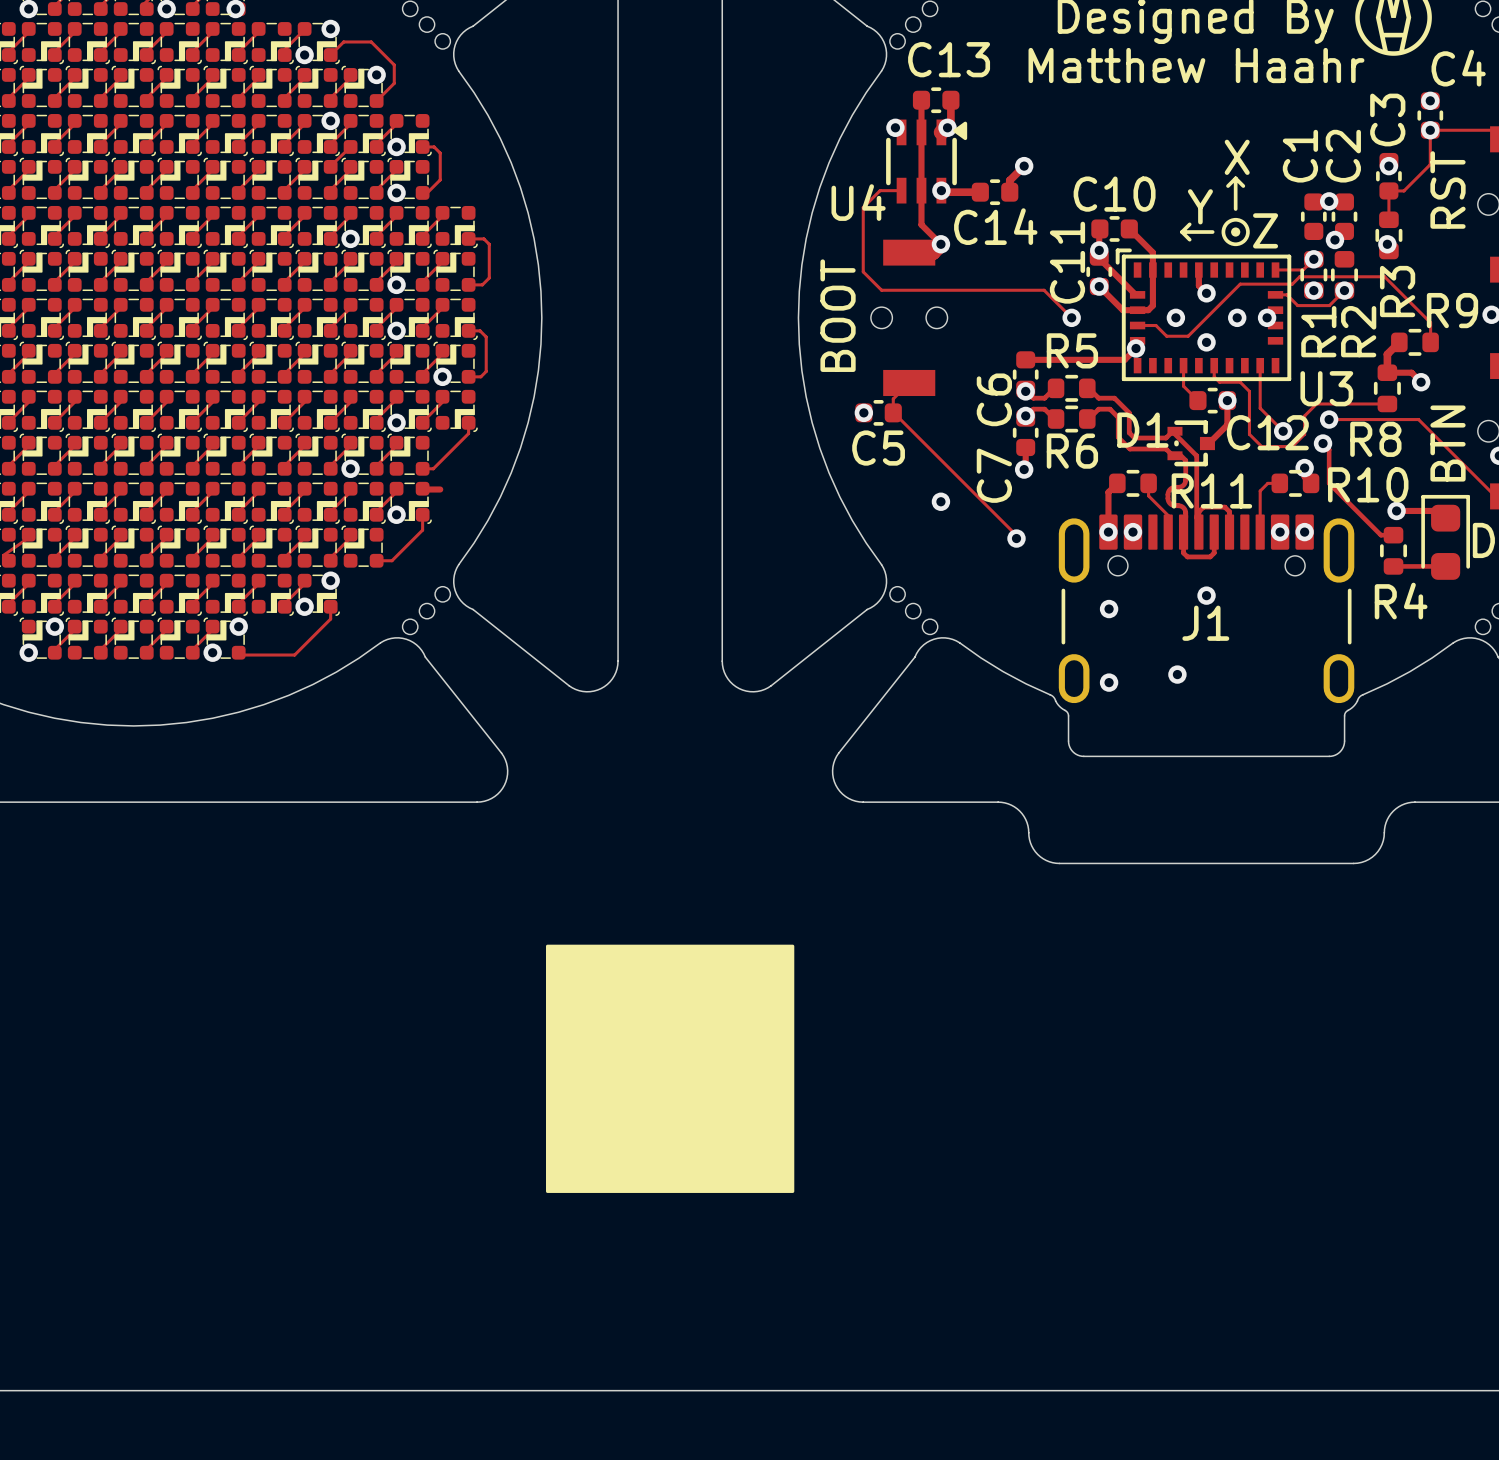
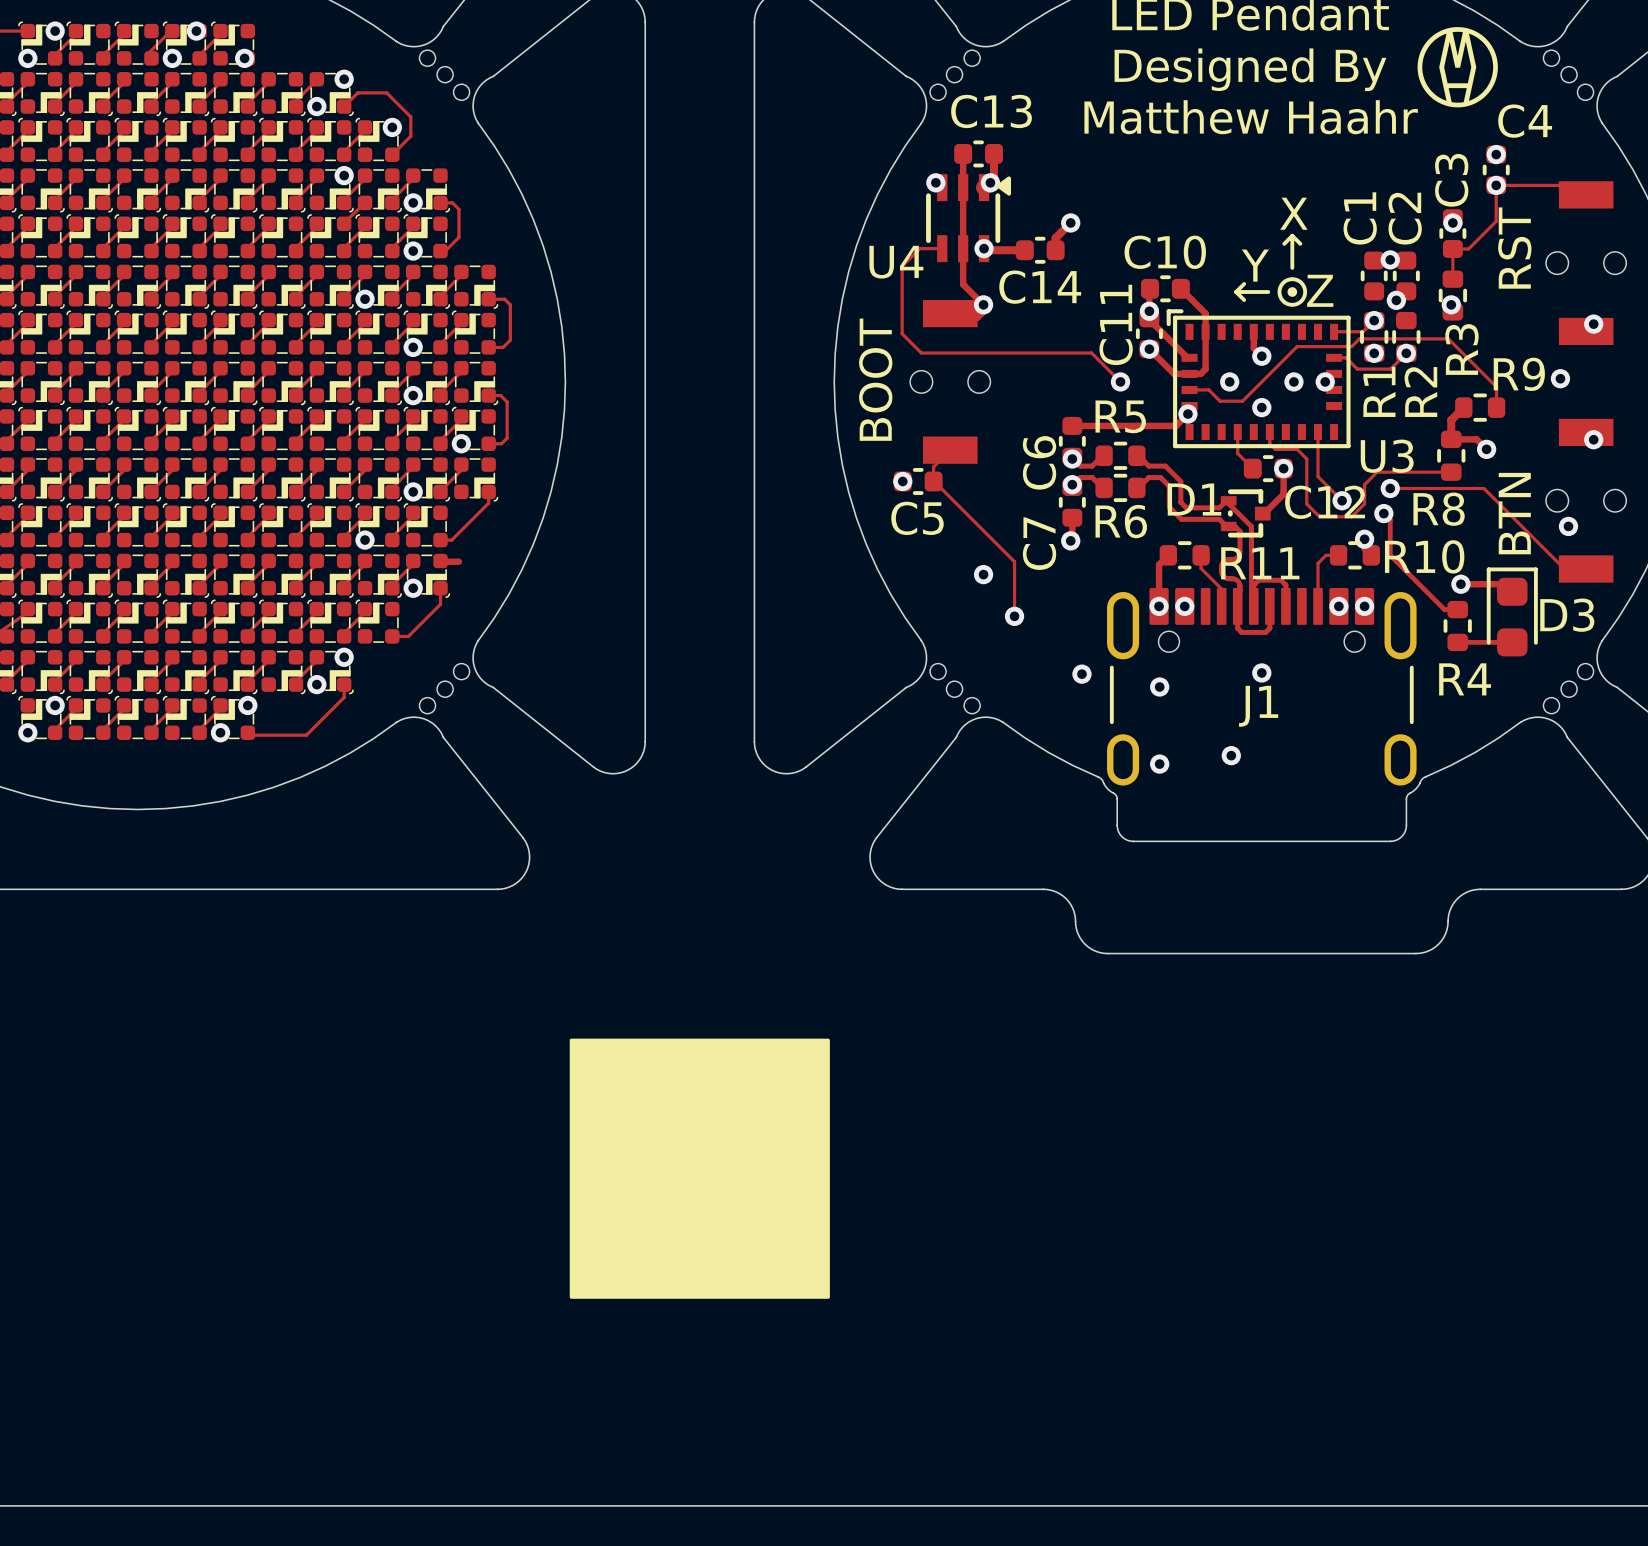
track: (970, 489) (1016, 535) (1016, 538) -> (1014, 561) (1014, 616)
via: (1016, 538) -> none
via: none -> (1014, 616)
via: none -> (1081, 674)

